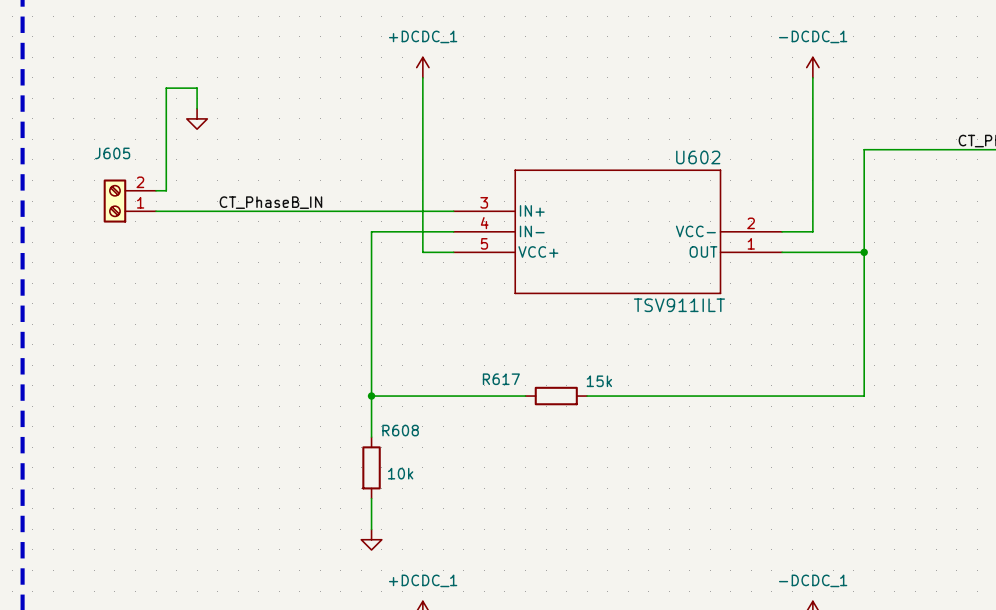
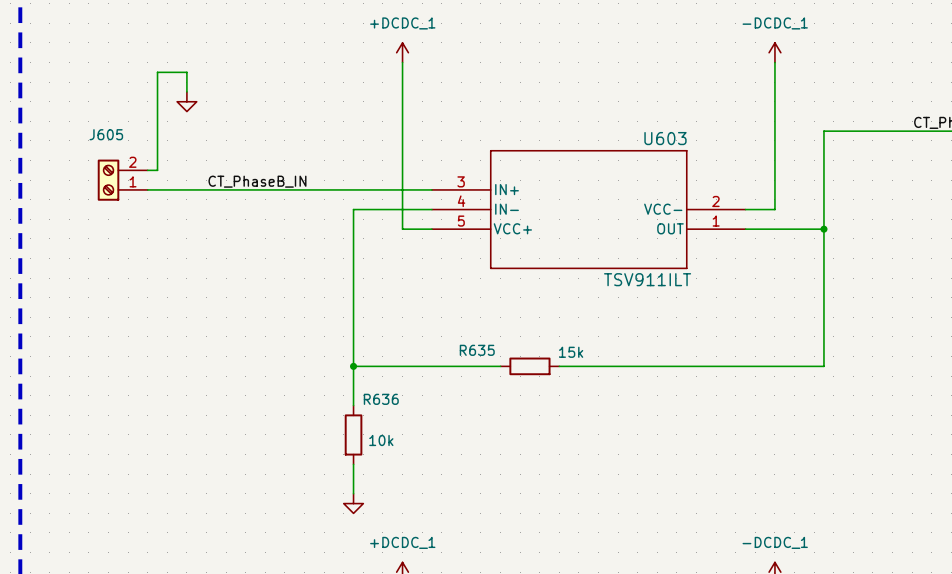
U602 name: U602 (698, 157) -> U603 (665, 138)
R617 name: R617 (501, 379) -> R635 (477, 350)
R608 name: R608 (400, 430) -> R636 (381, 399)

